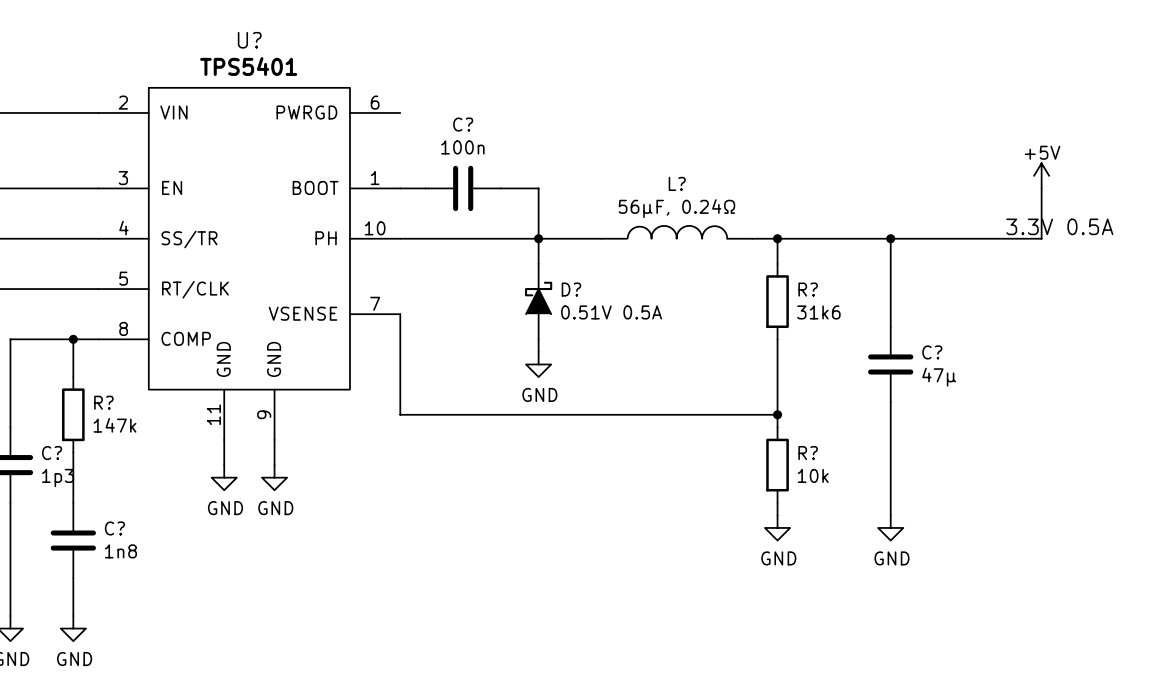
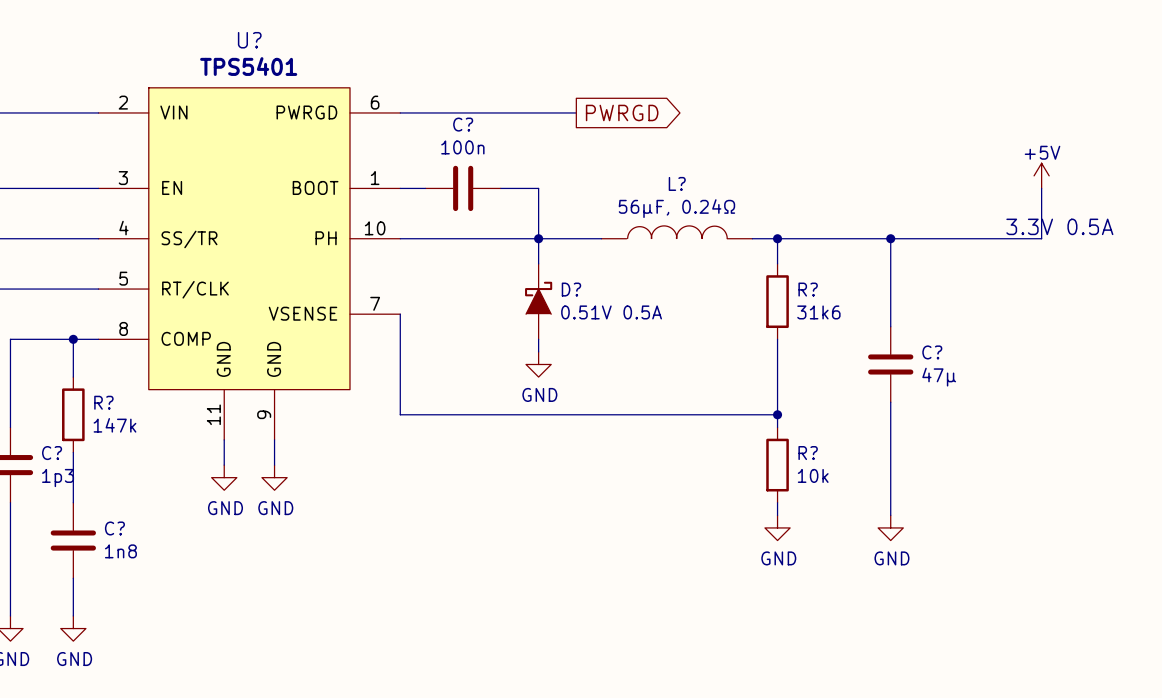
wire: none -> (400, 112) (576, 112)
global label: none -> PWRGD (622, 112)

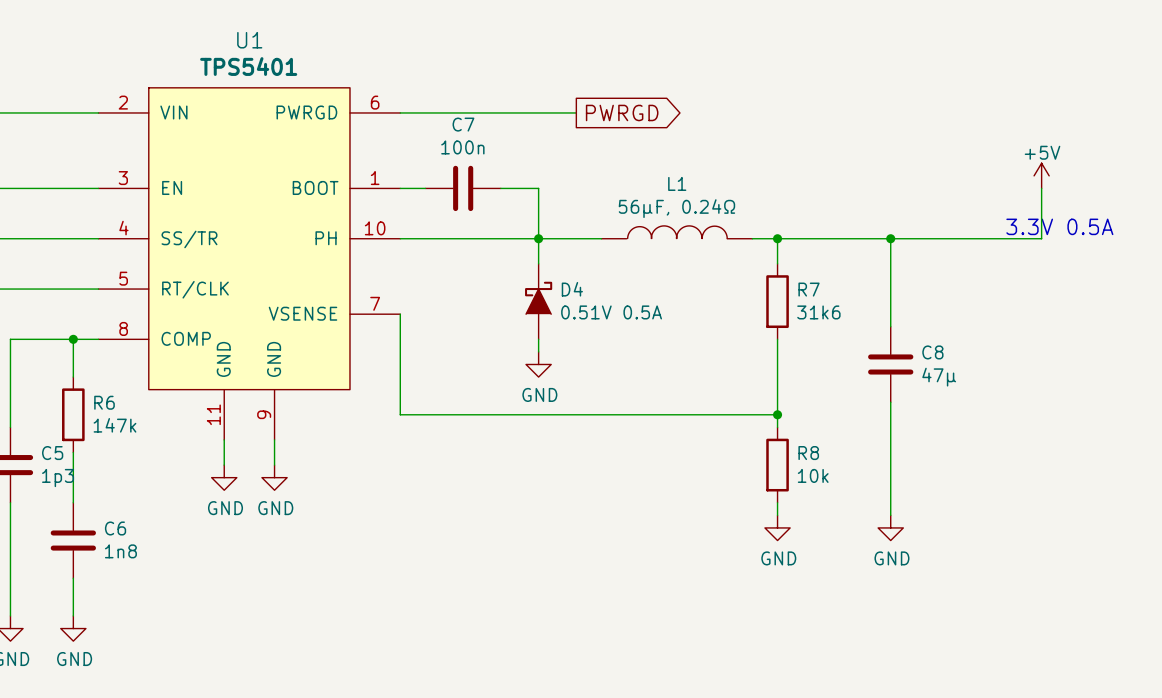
U? name: U? (249, 40) -> U1 (249, 40)
C? name: C? (463, 124) -> C7 (463, 124)
L? name: L? (677, 183) -> L1 (677, 183)
D? name: D? (571, 289) -> D4 (572, 289)
R? name: R? (808, 289) -> R7 (809, 289)
C? name: C? (932, 352) -> C8 (932, 352)
R? name: R? (103, 402) -> R6 (104, 402)
C? name: C? (52, 453) -> C5 (52, 453)
R? name: R? (808, 453) -> R8 (808, 453)
C? name: C? (114, 528) -> C6 (115, 528)

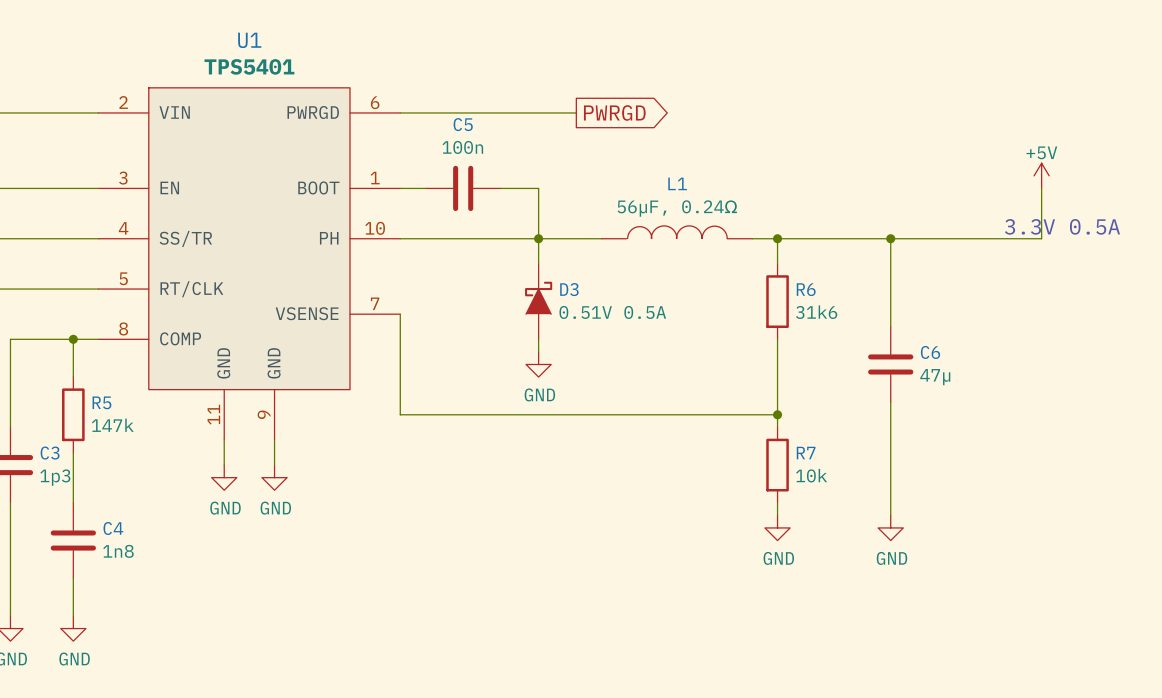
C7 name: C7 (463, 124) -> C5 (463, 124)
D4 name: D4 (572, 289) -> D3 (569, 289)
R7 name: R7 (809, 289) -> R6 (806, 289)
C8 name: C8 (932, 352) -> C6 (930, 352)
R6 name: R6 (104, 402) -> R5 (101, 402)
C5 name: C5 (52, 453) -> C3 (50, 453)
R8 name: R8 (808, 453) -> R7 (806, 453)
C6 name: C6 (115, 528) -> C4 (113, 528)

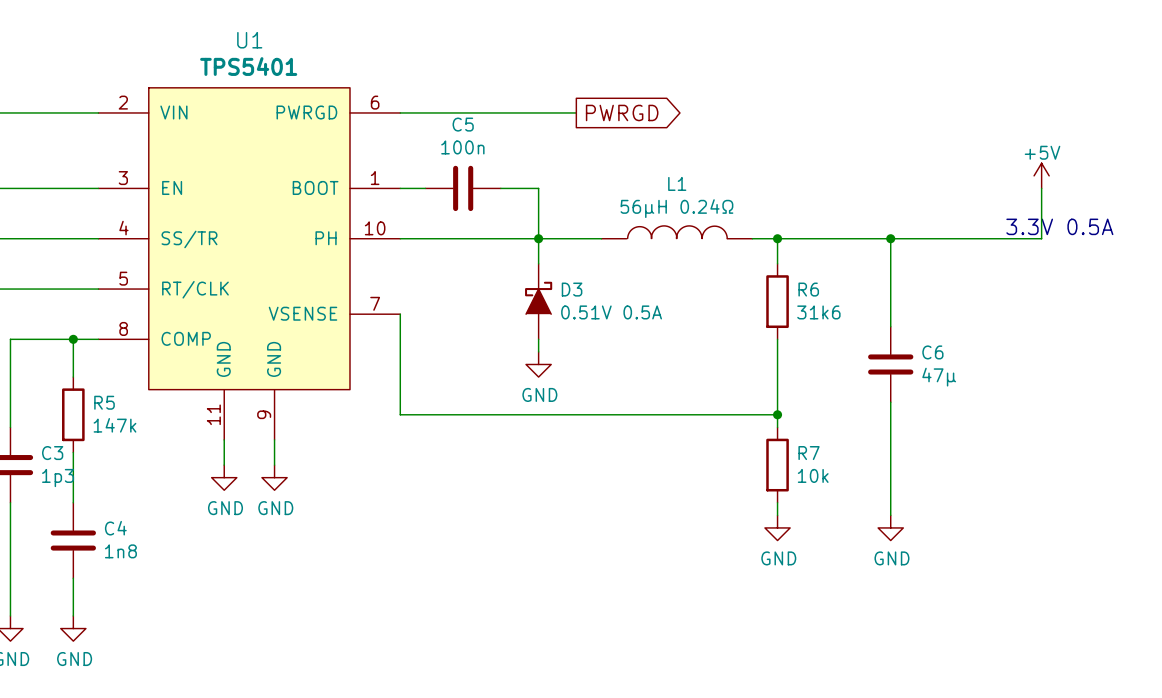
L1 value: 56µF, 0.24Ω (677, 208) -> 56µH 0.24Ω (676, 208)

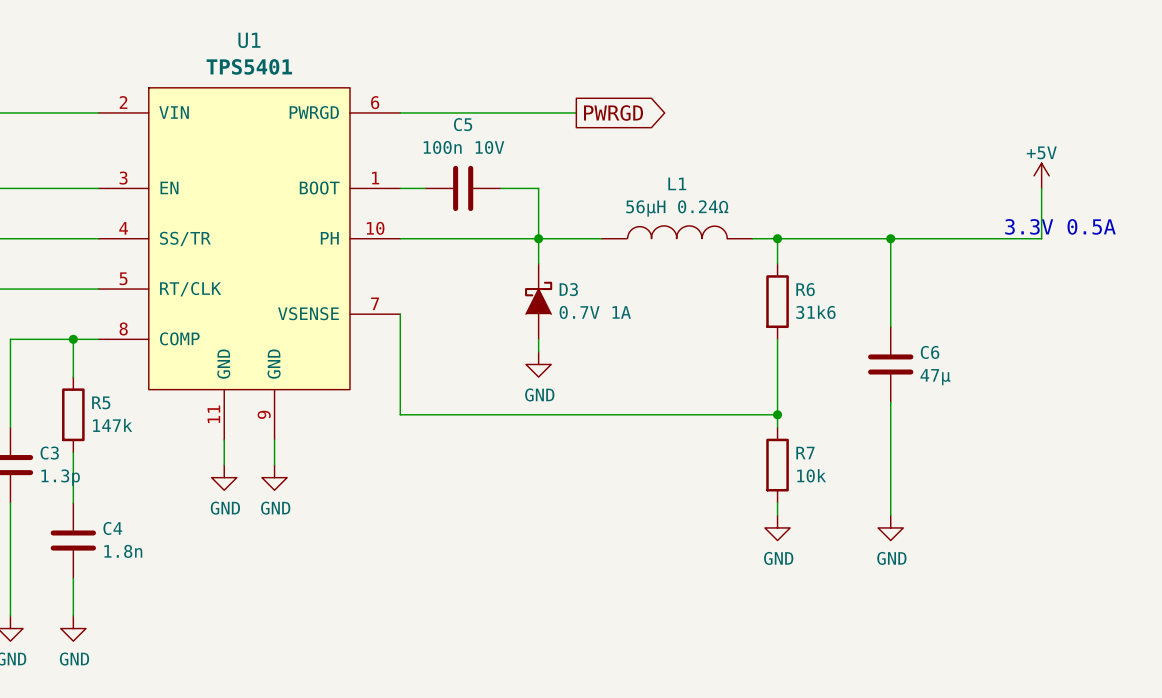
C5 value: 100n (462, 147) -> 100n 10V (463, 147)
D3 value: 0.51V 0.5A (611, 312) -> 0.7V 1A (595, 312)
C3 value: 1p3 (58, 478) -> 1.3p (60, 477)
C4 value: 1n8 (120, 551) -> 1.8n (123, 551)

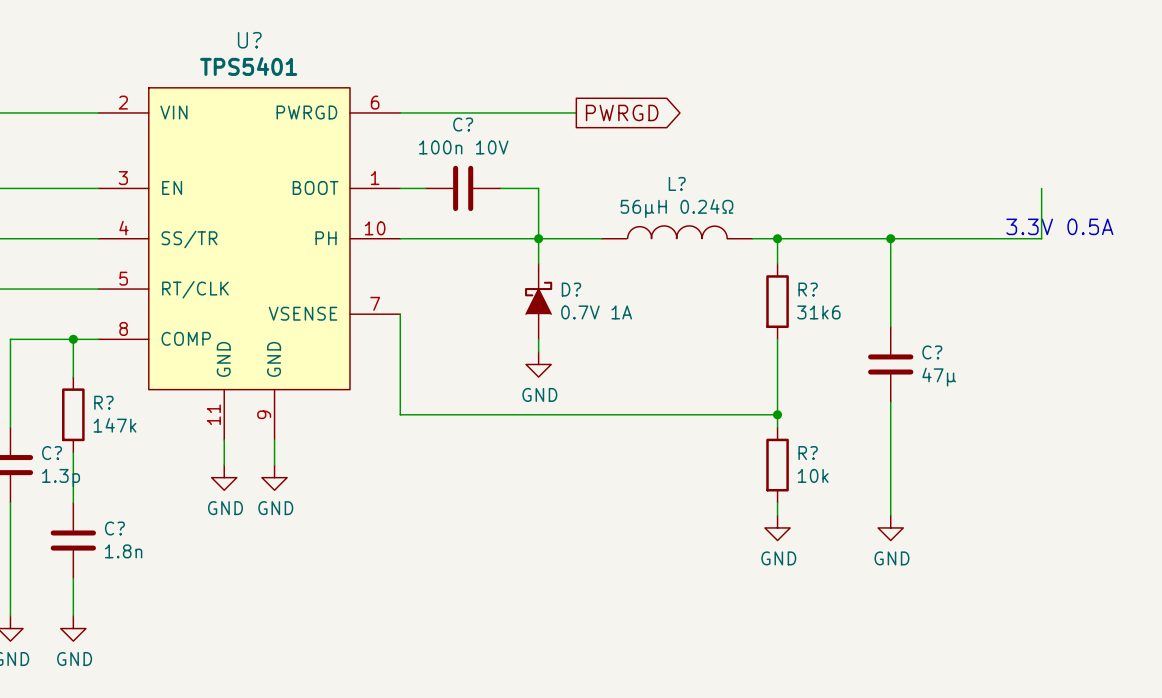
U1 name: U1 (249, 40) -> U? (249, 40)
C5 name: C5 (463, 124) -> C? (463, 124)
power symbol: +5V (1041, 175) -> none
L1 name: L1 (677, 183) -> L? (677, 183)
D3 name: D3 (568, 289) -> D? (571, 289)
R6 name: R6 (805, 289) -> R? (808, 289)
C6 name: C6 (930, 352) -> C? (932, 352)
R5 name: R5 (101, 402) -> R? (103, 402)
C3 name: C3 (49, 453) -> C? (52, 453)
R7 name: R7 (805, 453) -> R? (808, 453)
C4 name: C4 (112, 528) -> C? (114, 528)

